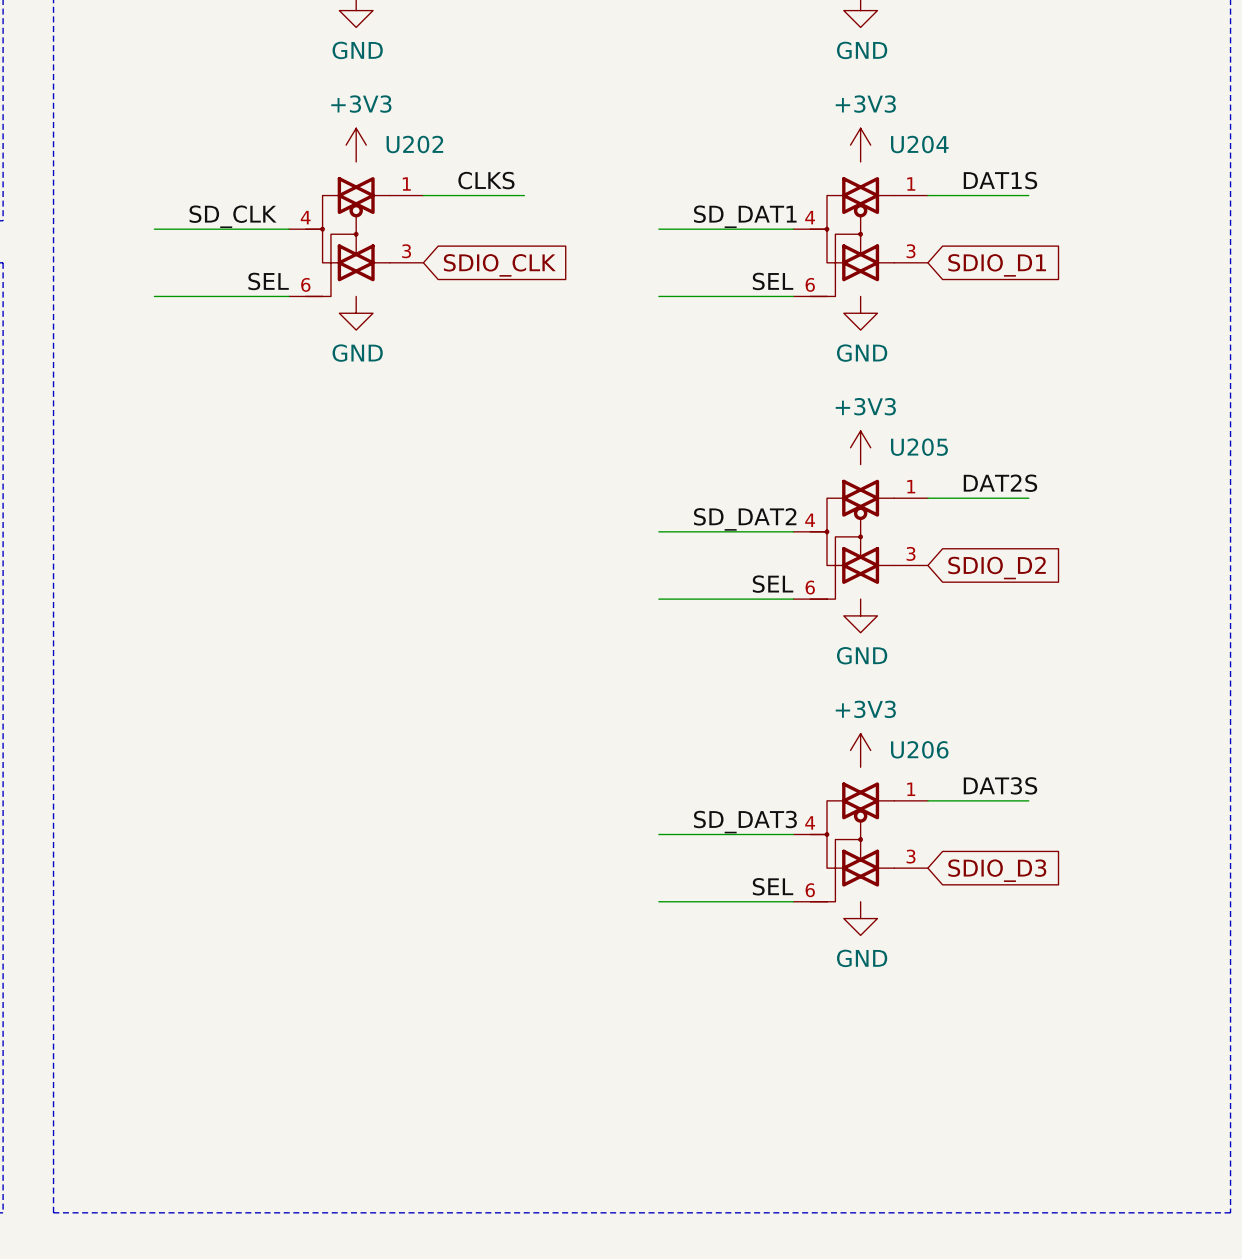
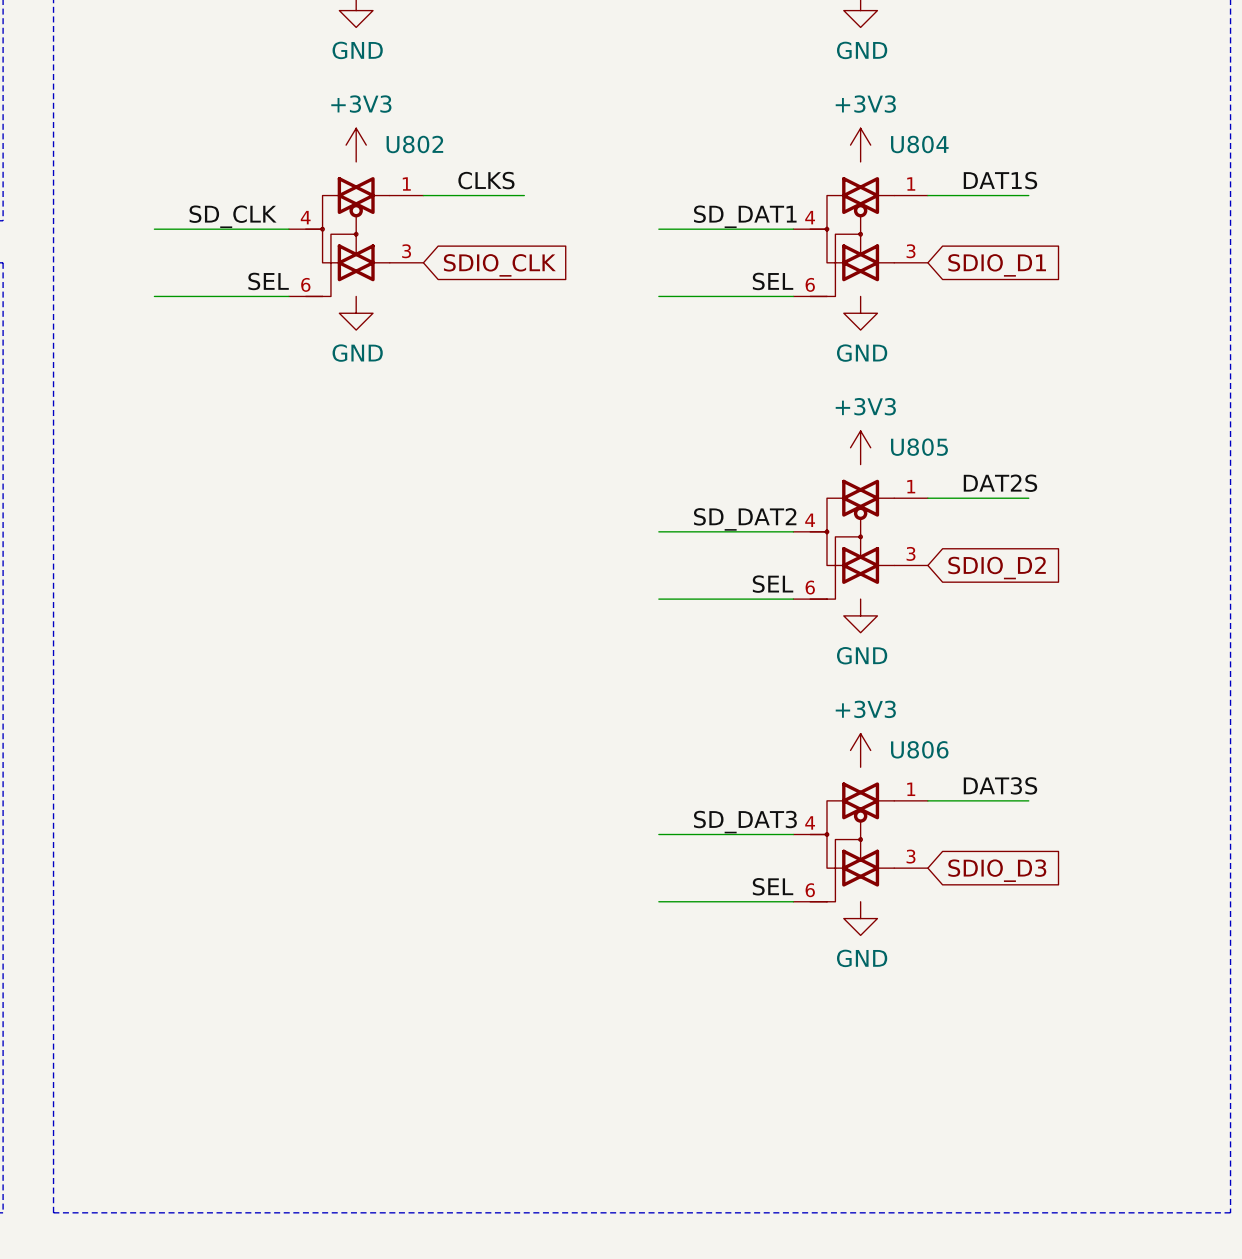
U202 name: U202 (414, 144) -> U802 (414, 144)
U204 name: U204 (919, 144) -> U804 (919, 144)
U205 name: U205 (919, 447) -> U805 (919, 447)
U206 name: U206 (919, 749) -> U806 (919, 749)

